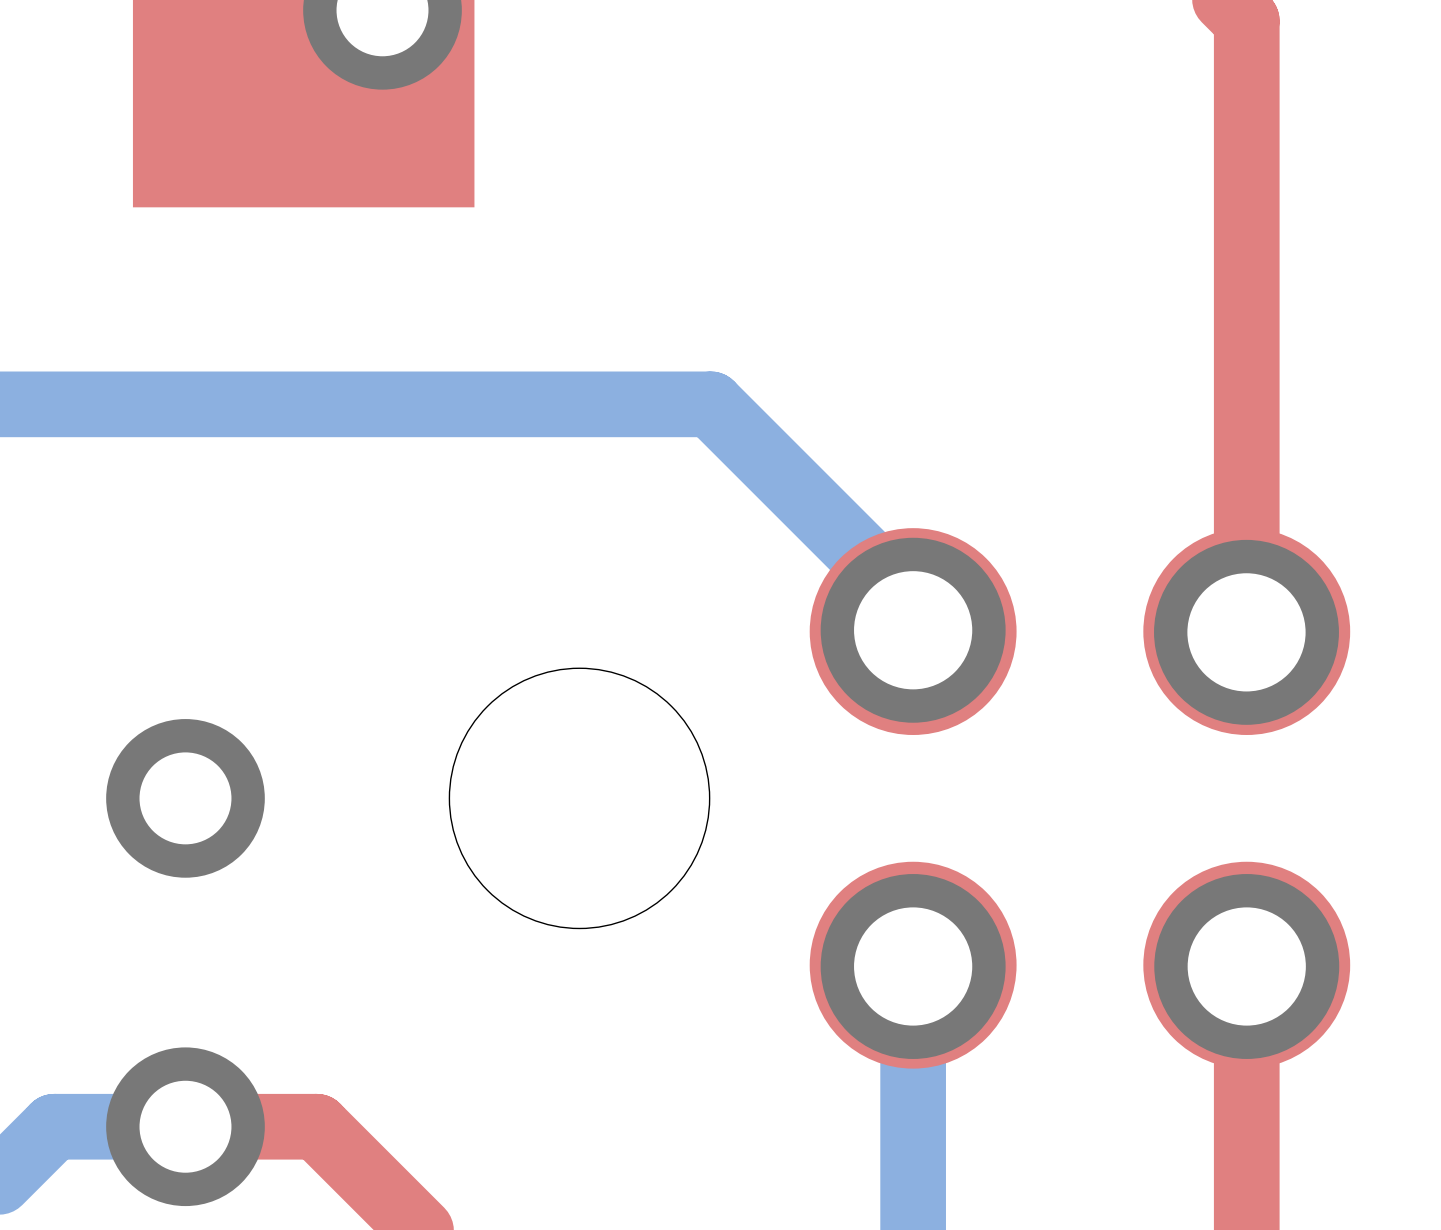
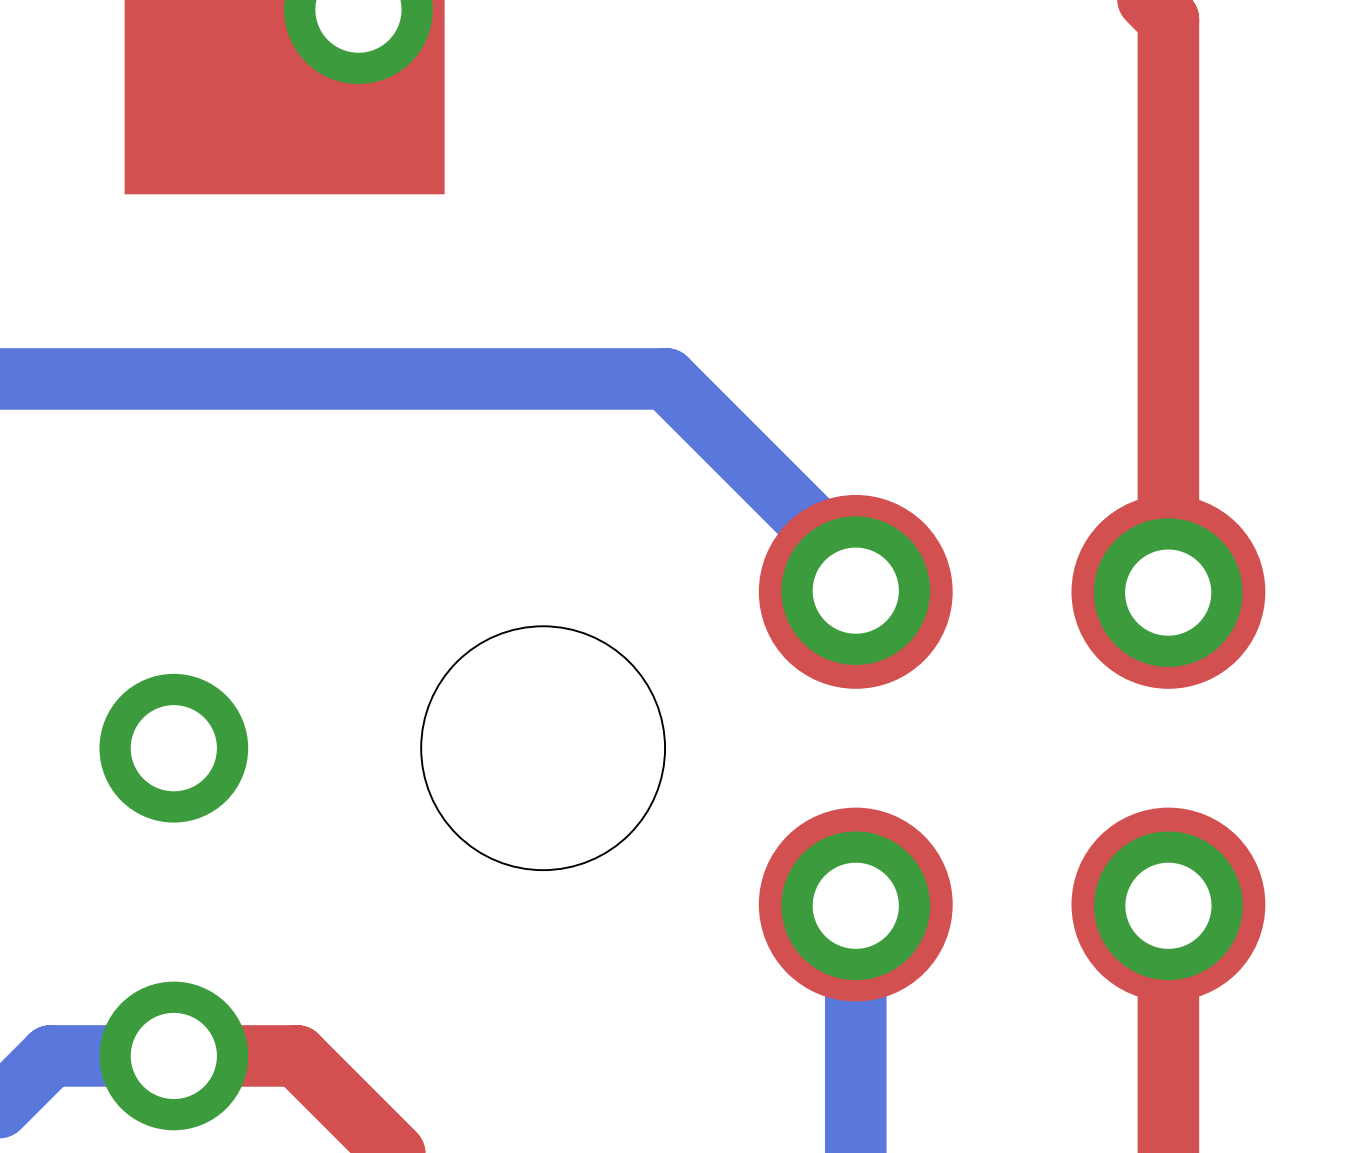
via size: [820, 537, 1006, 723] -> [781, 516, 931, 666]
via size: [1154, 539, 1339, 725] -> [1093, 518, 1243, 667]
via size: [820, 874, 1006, 1059] -> [781, 831, 931, 981]
via size: [1154, 874, 1340, 1059] -> [1094, 831, 1243, 981]

